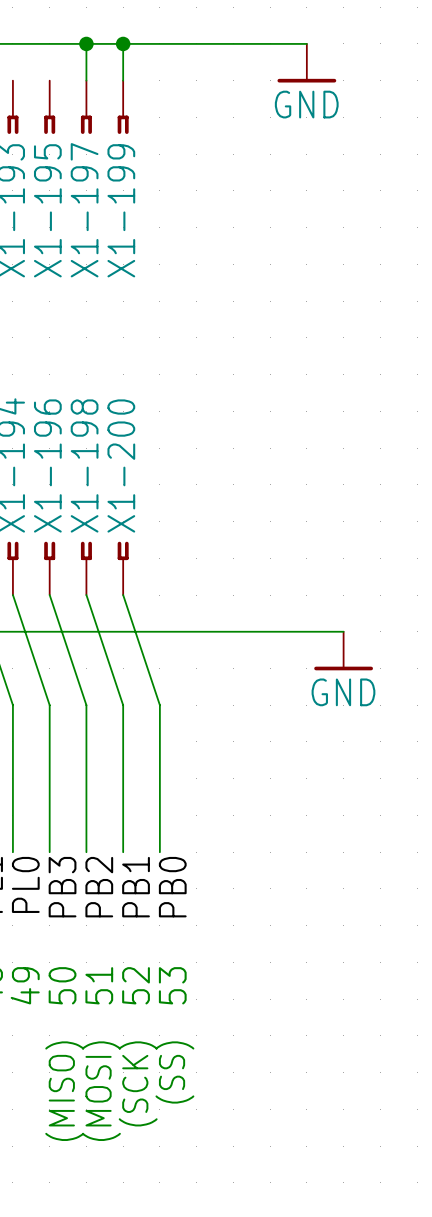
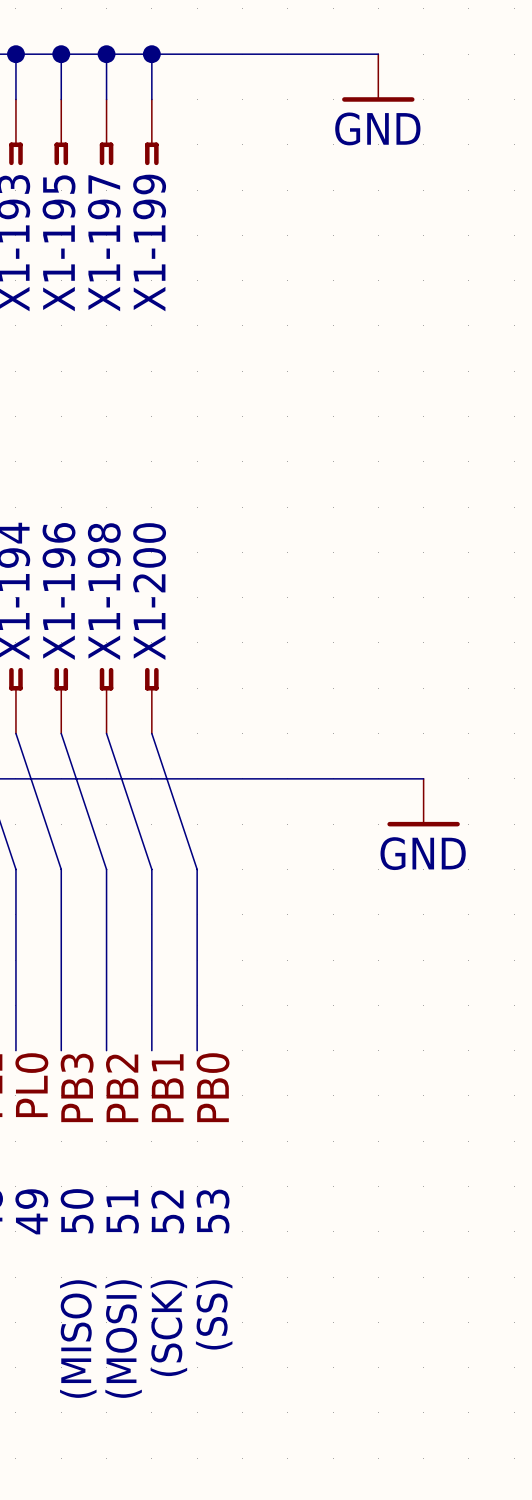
wire: none -> (15, 54) (15, 99)
junction: none -> (15, 54)
wire: none -> (61, 54) (61, 99)
junction: none -> (61, 54)

